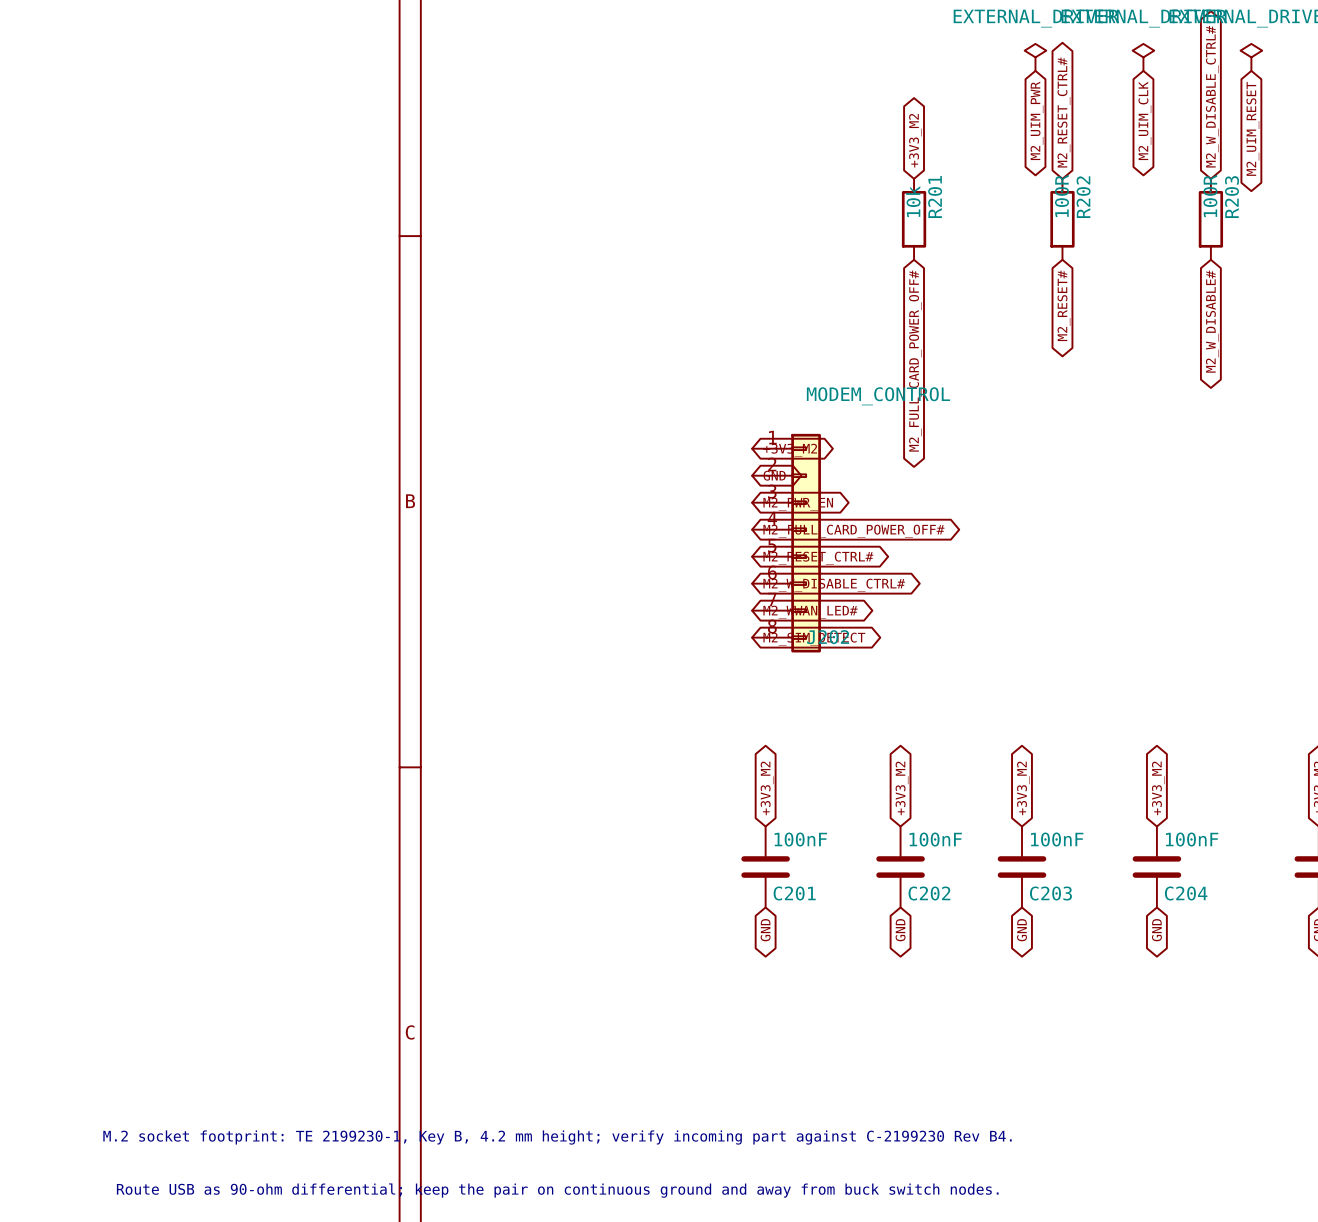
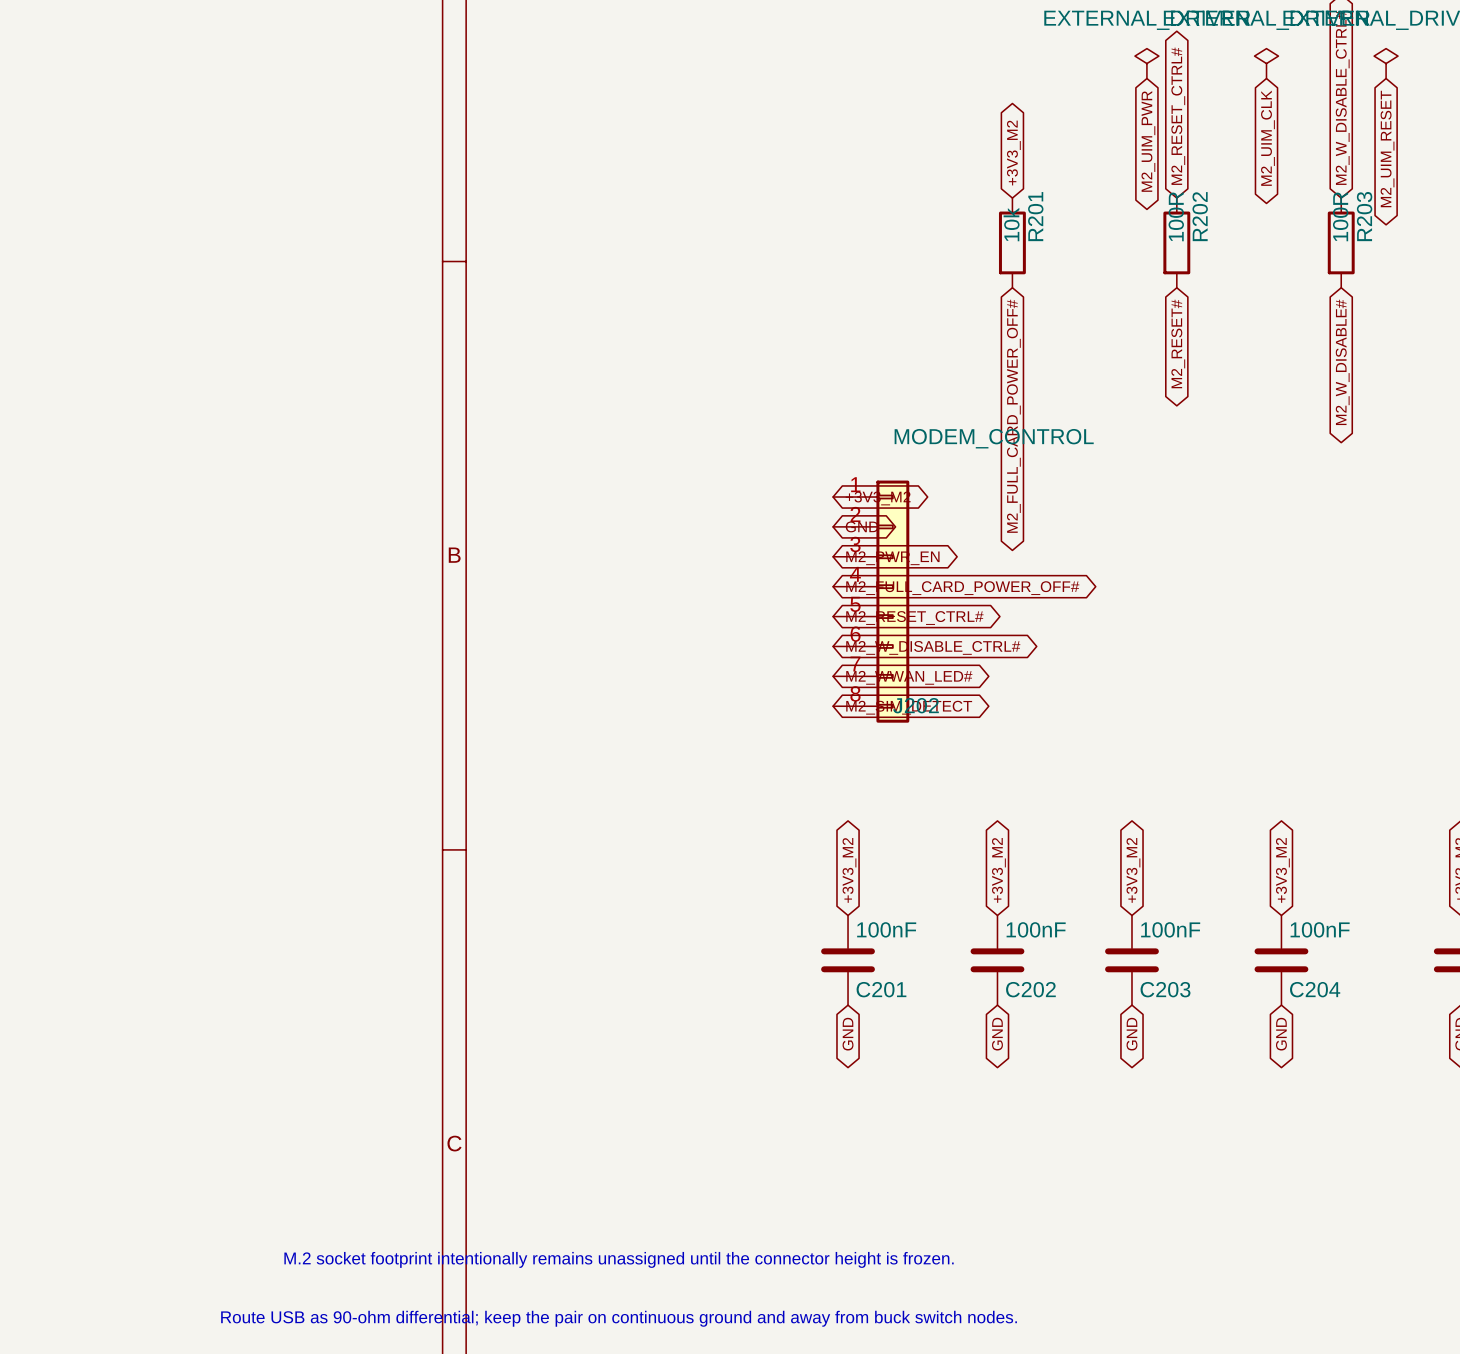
text: M.2 socket footprint: TE 2199230-1, Key B, 4.2 mm height; verify incoming part against C-2199230 Rev B4. (557, 1137) -> M.2 socket footprint intentionally remains unassigned until the connector height is frozen. (619, 1259)

